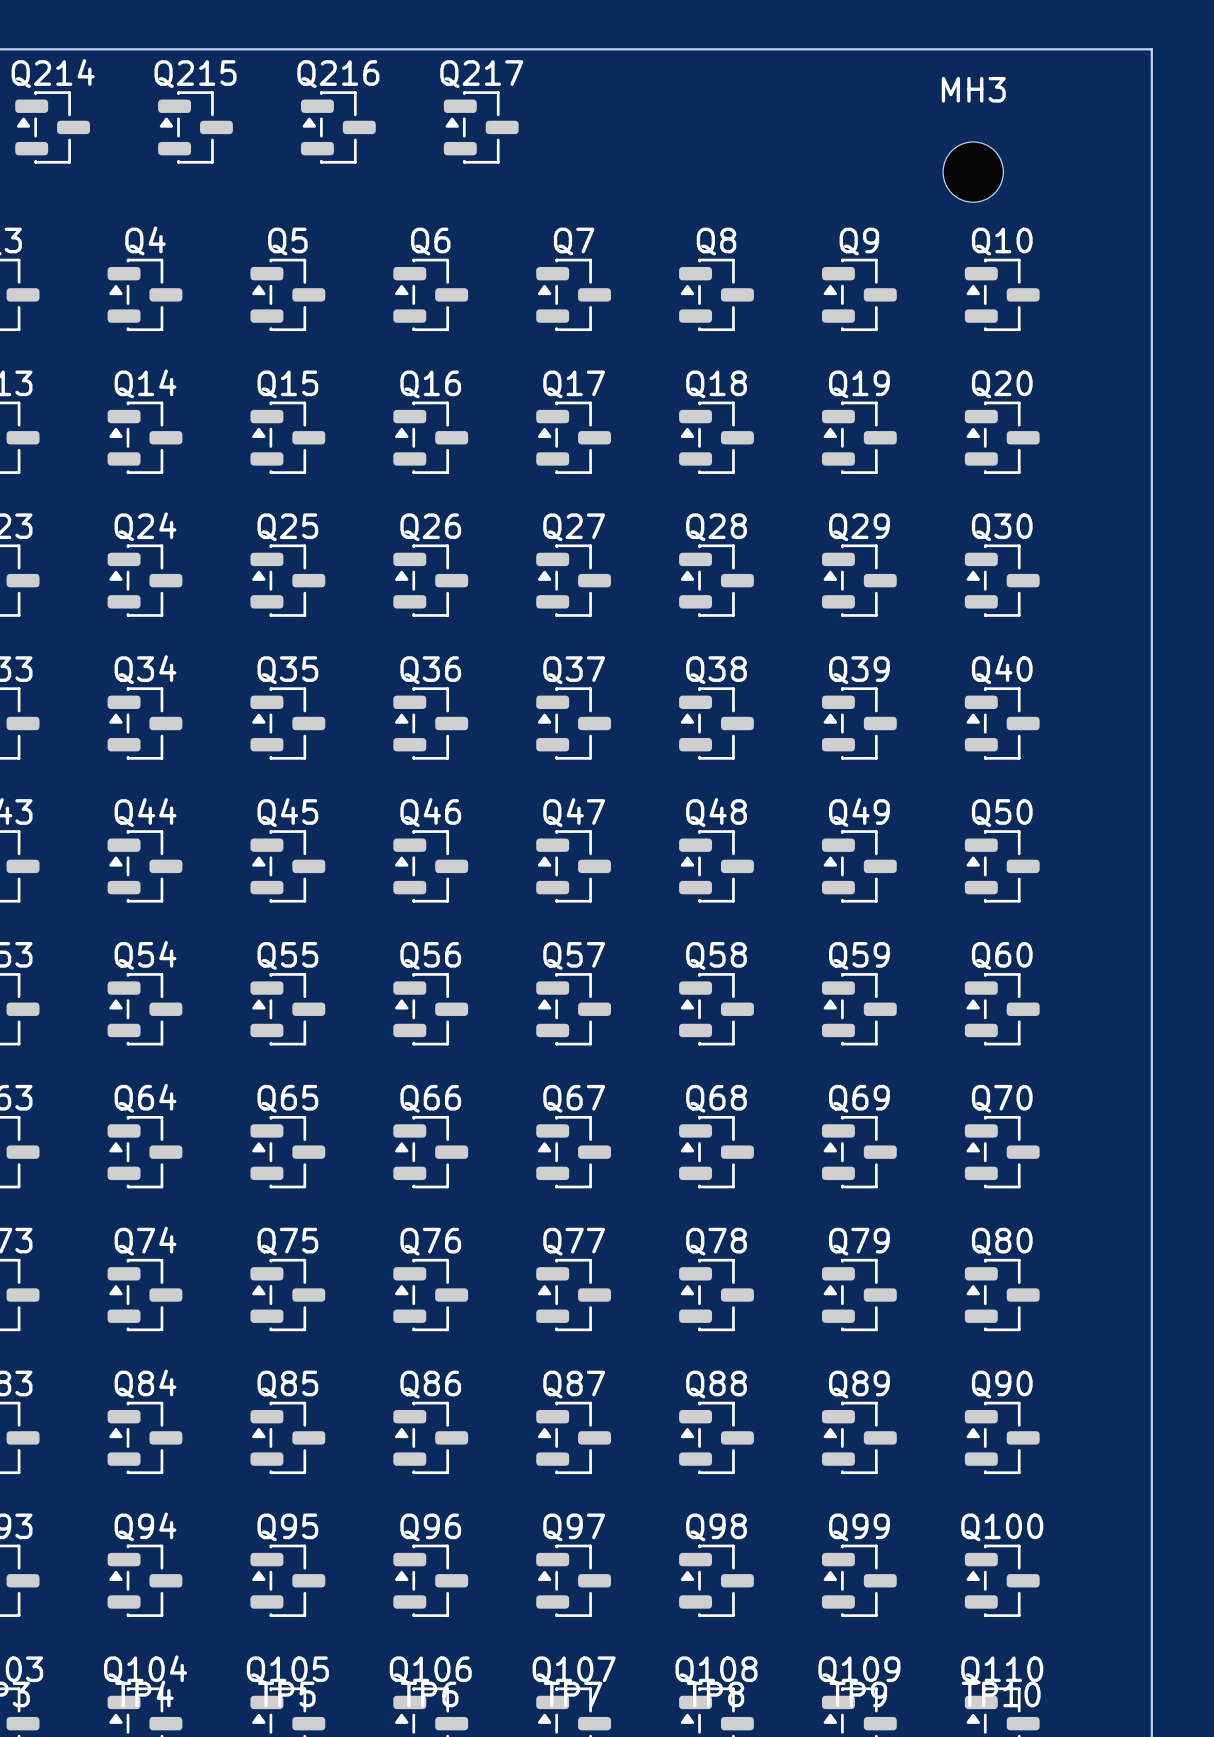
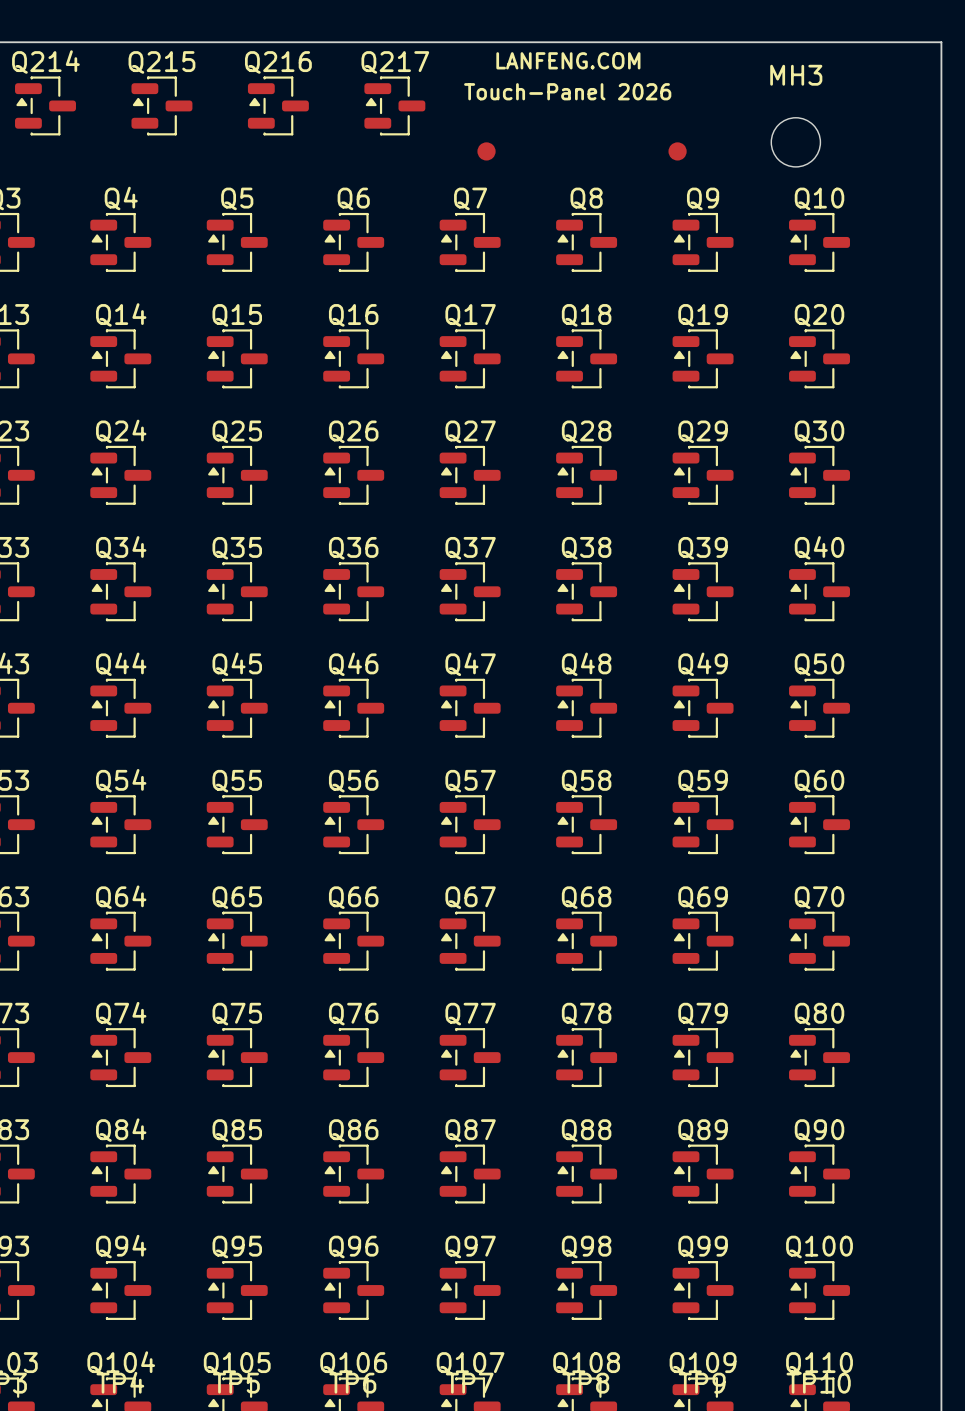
text: none -> LANFENG.COM (568, 60)
text: none -> Touch-Panel 2026 (567, 91)
part: none -> (486, 151)
part: none -> (677, 151)

